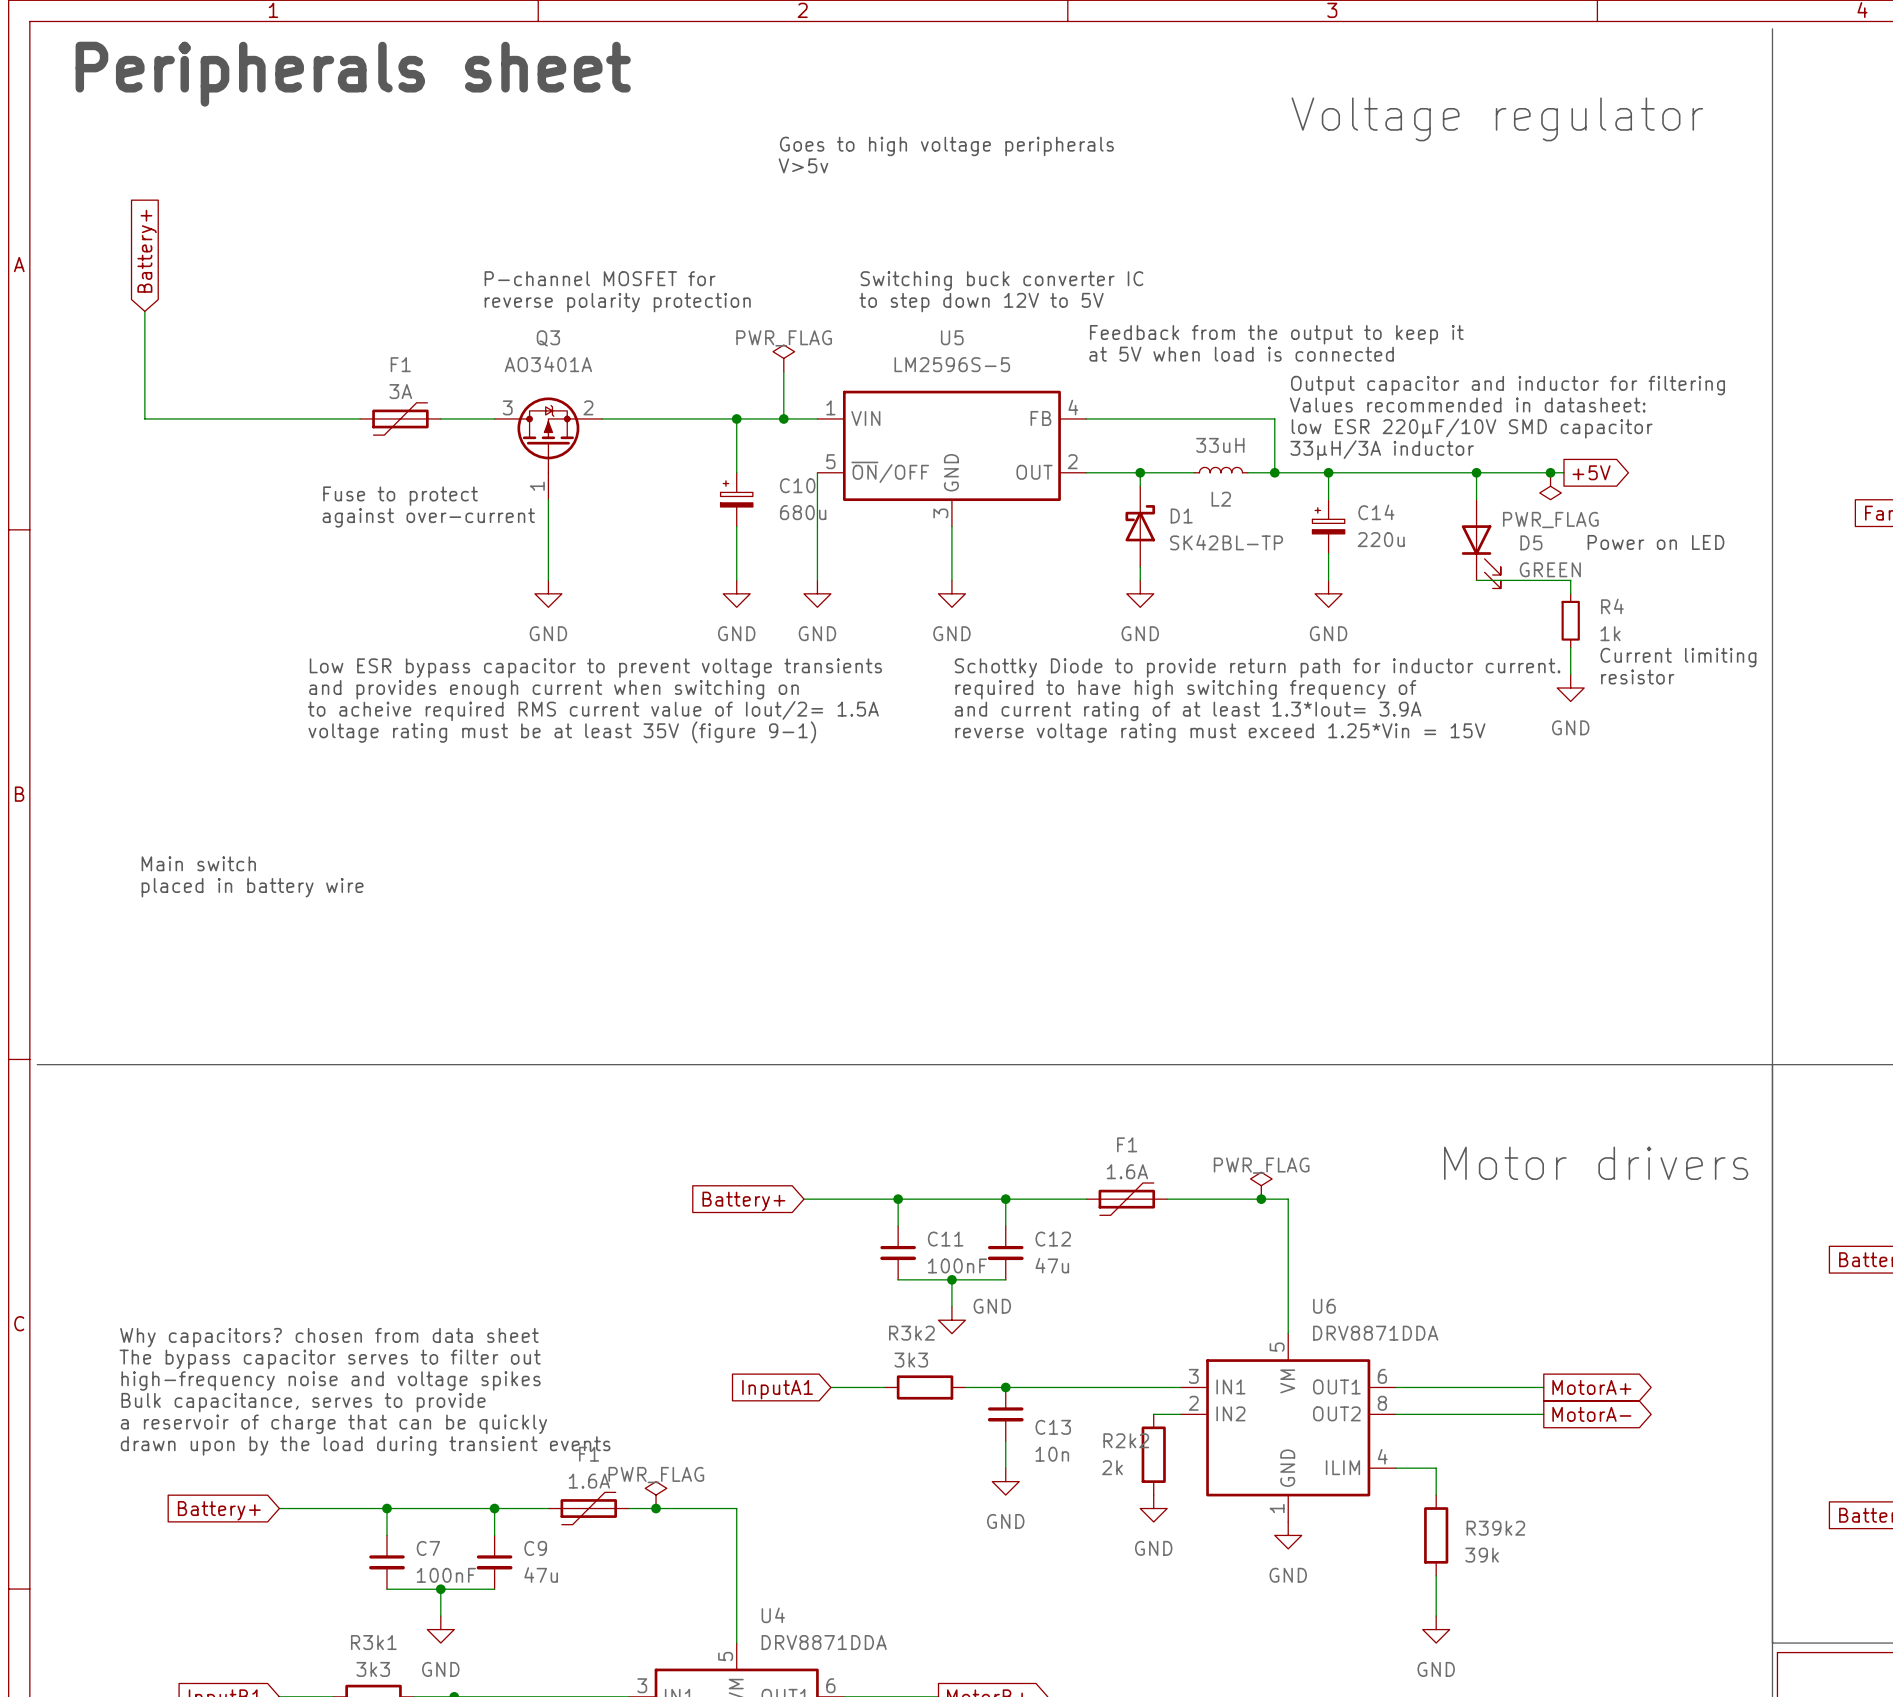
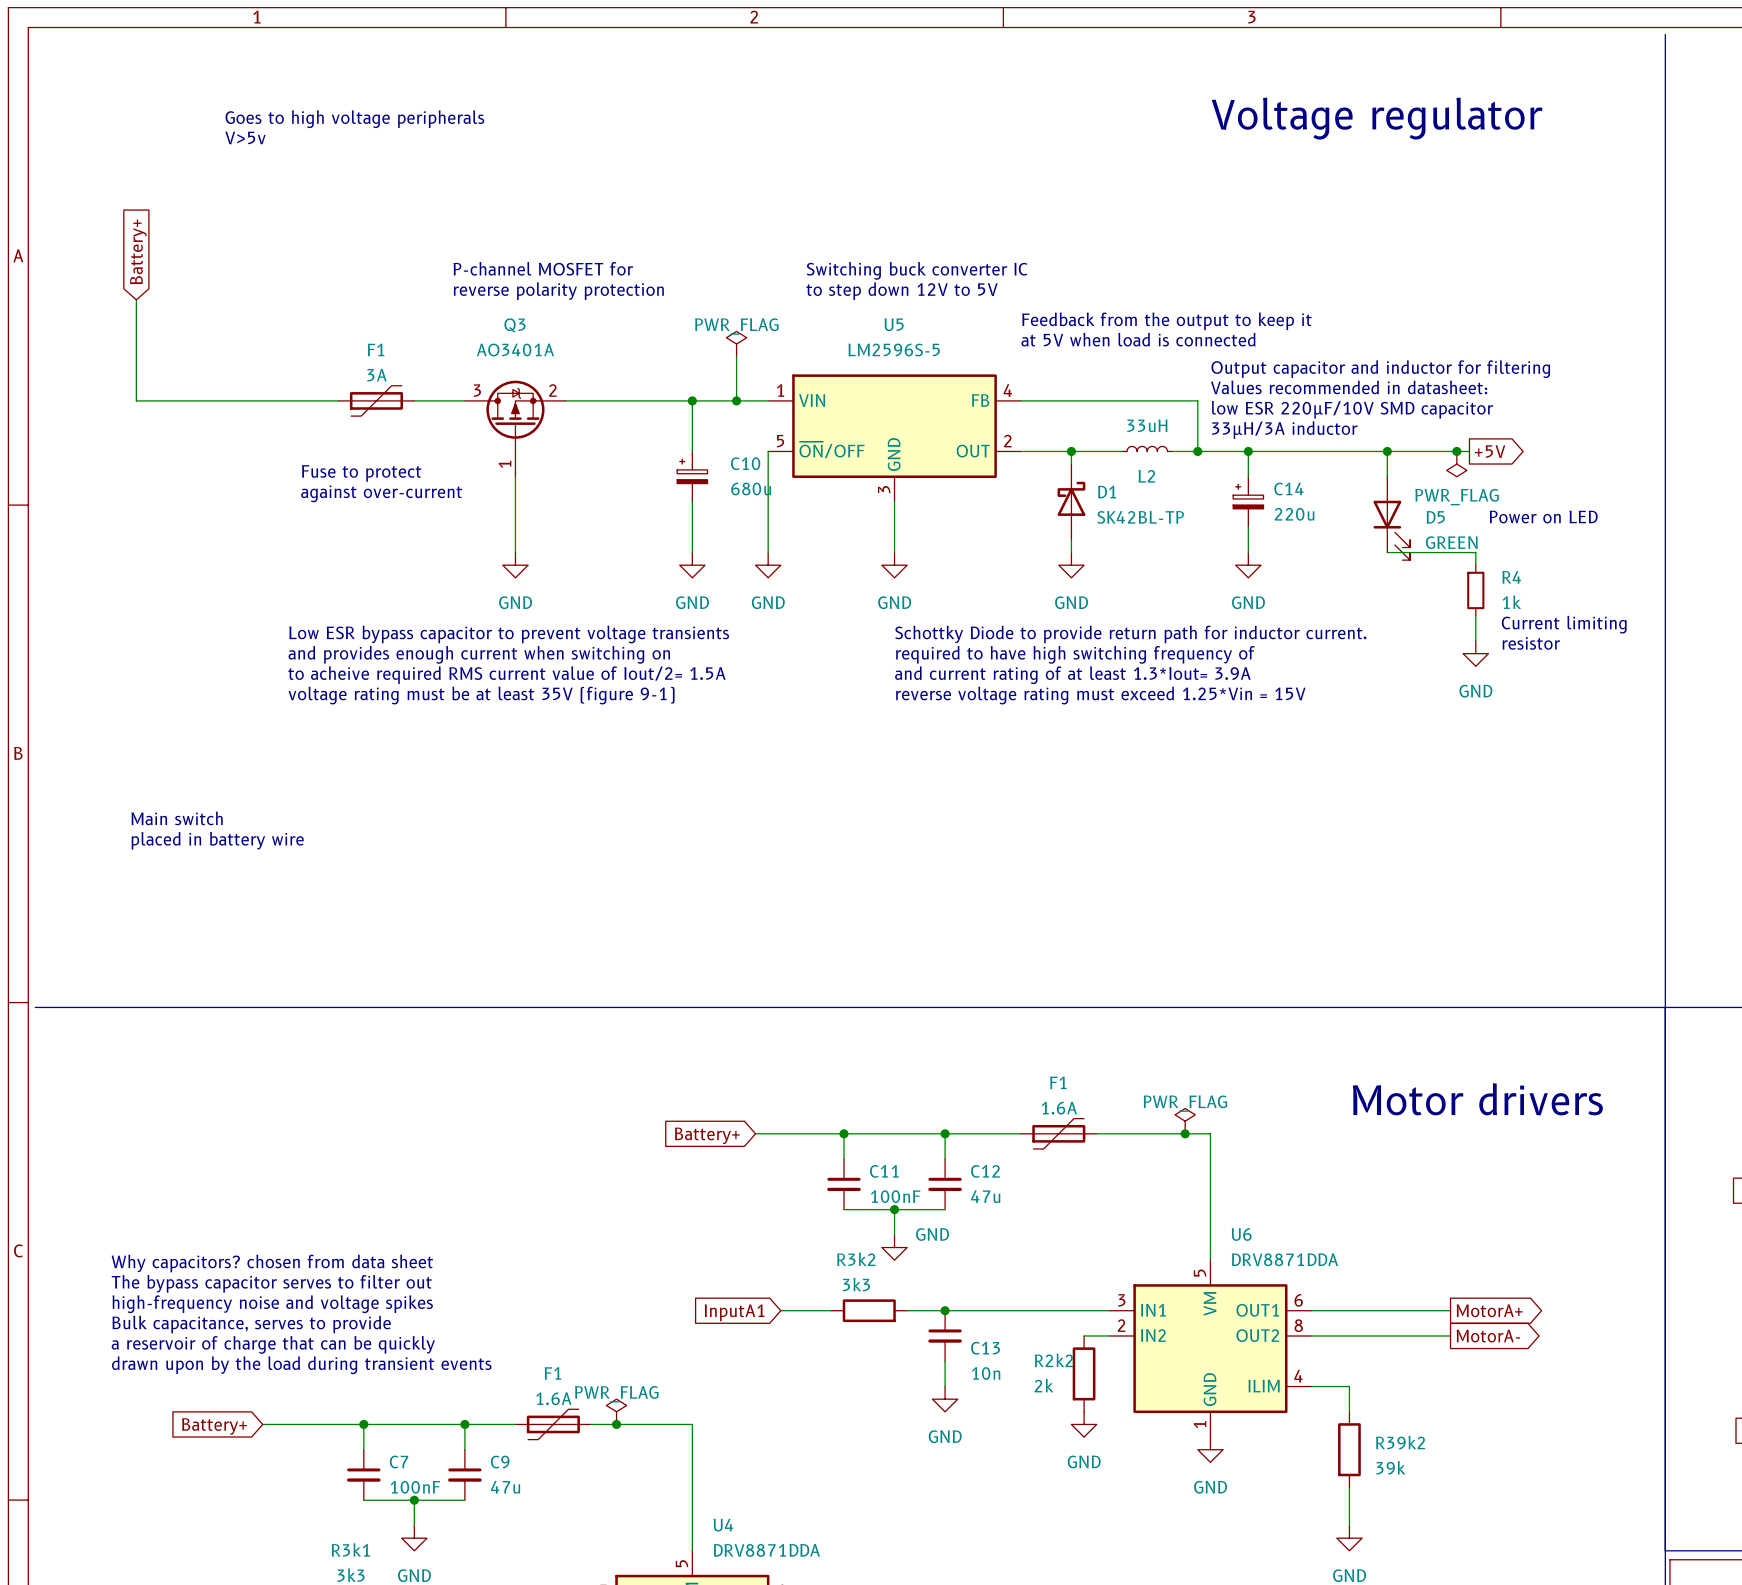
text: Peripherals sheet (353, 74) -> none
text: none -> Goes to high voltage peripherals (354, 119)
text: none -> V>5v (245, 137)
text: Goes to high voltage peripherals (946, 146) -> none
text: V>5v (803, 165) -> none

